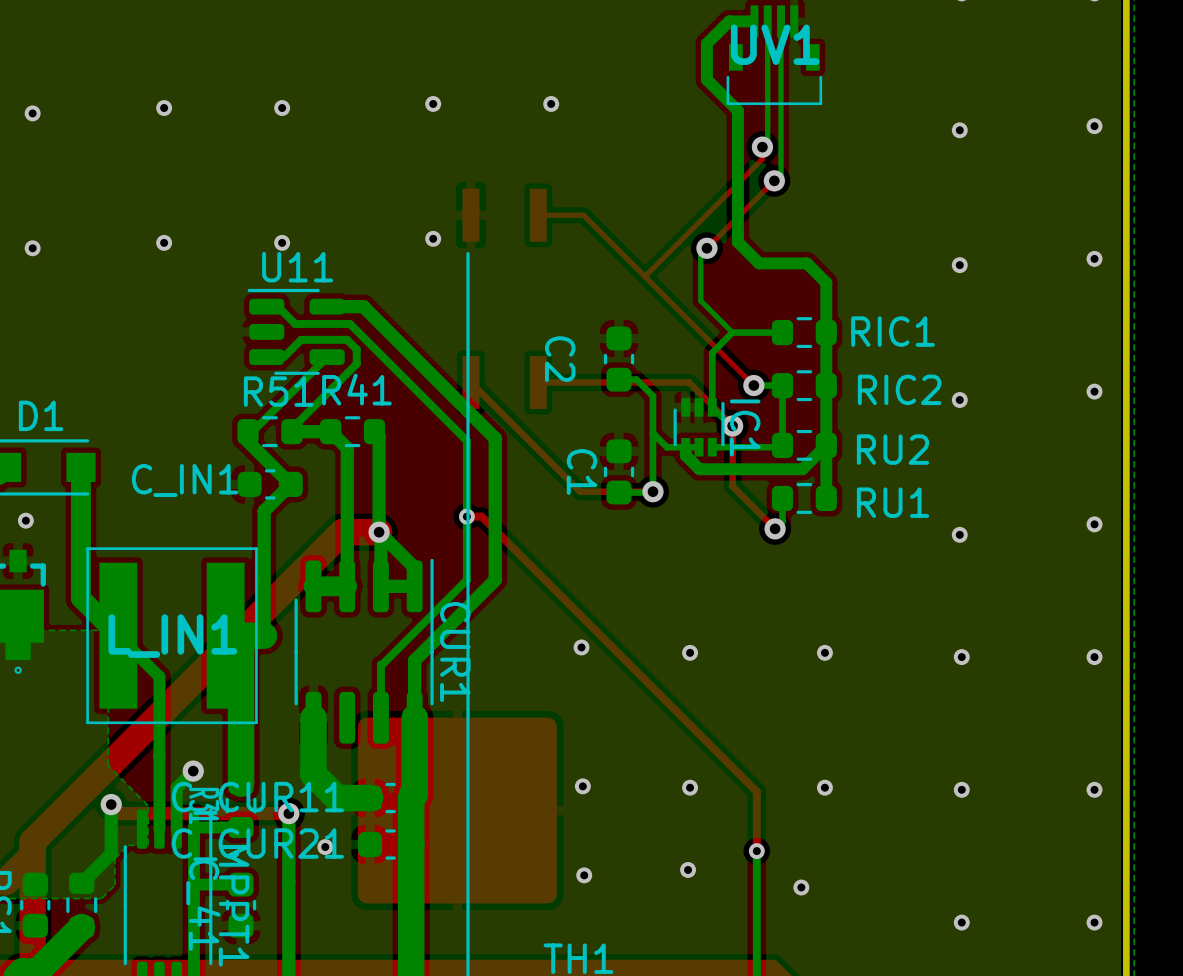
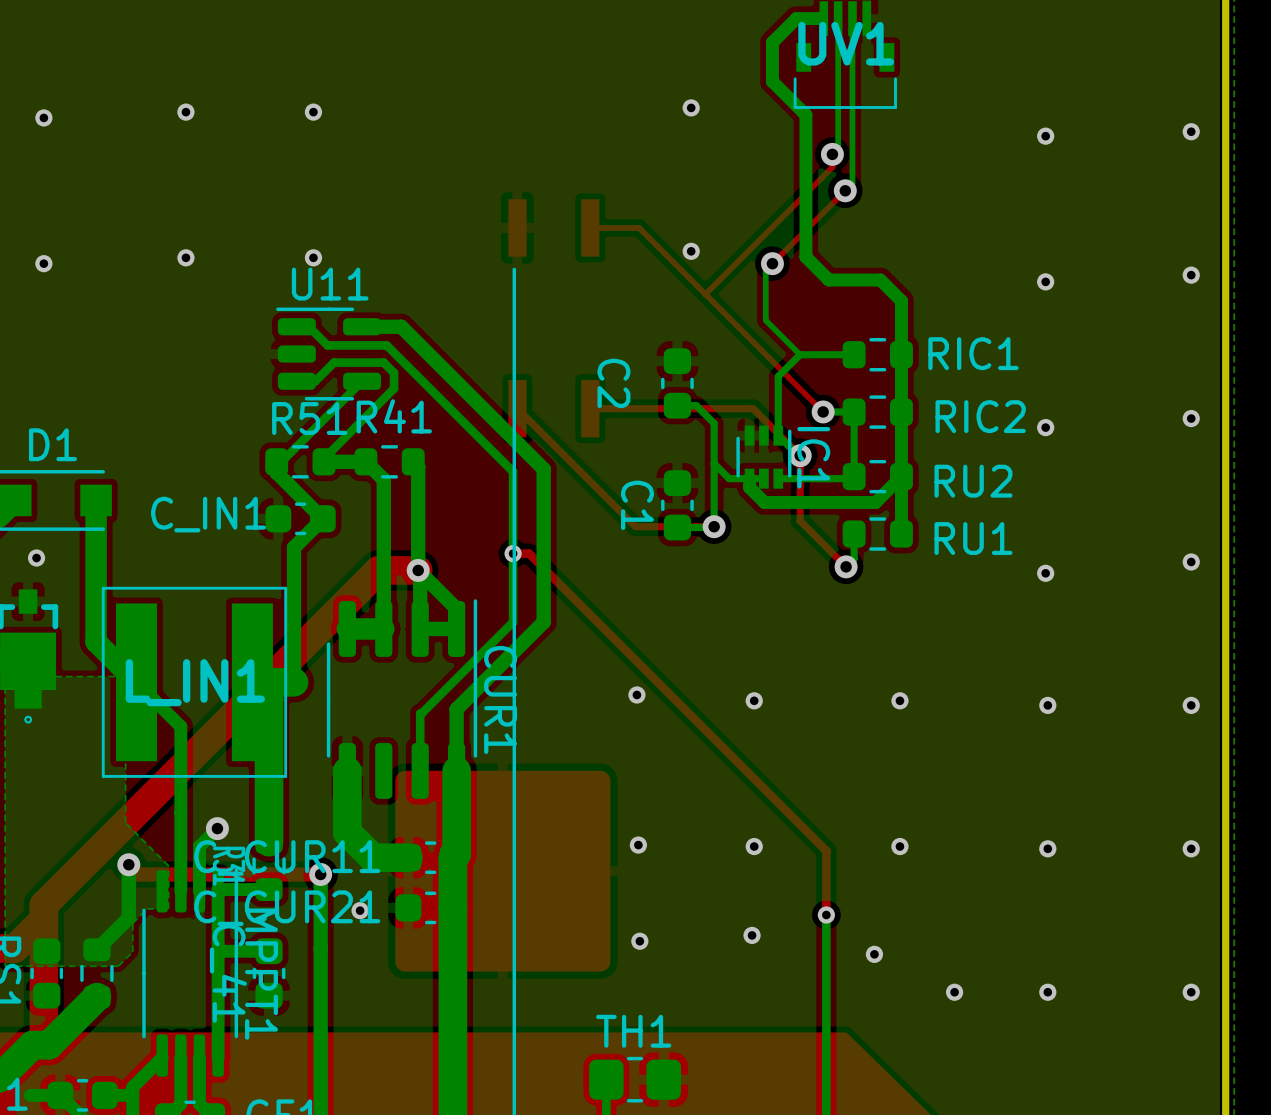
via: (433, 103) -> none
via: (551, 103) -> none
via: none -> (691, 107)
via: none -> (691, 251)
via: (433, 238) -> none
via: none -> (954, 992)

